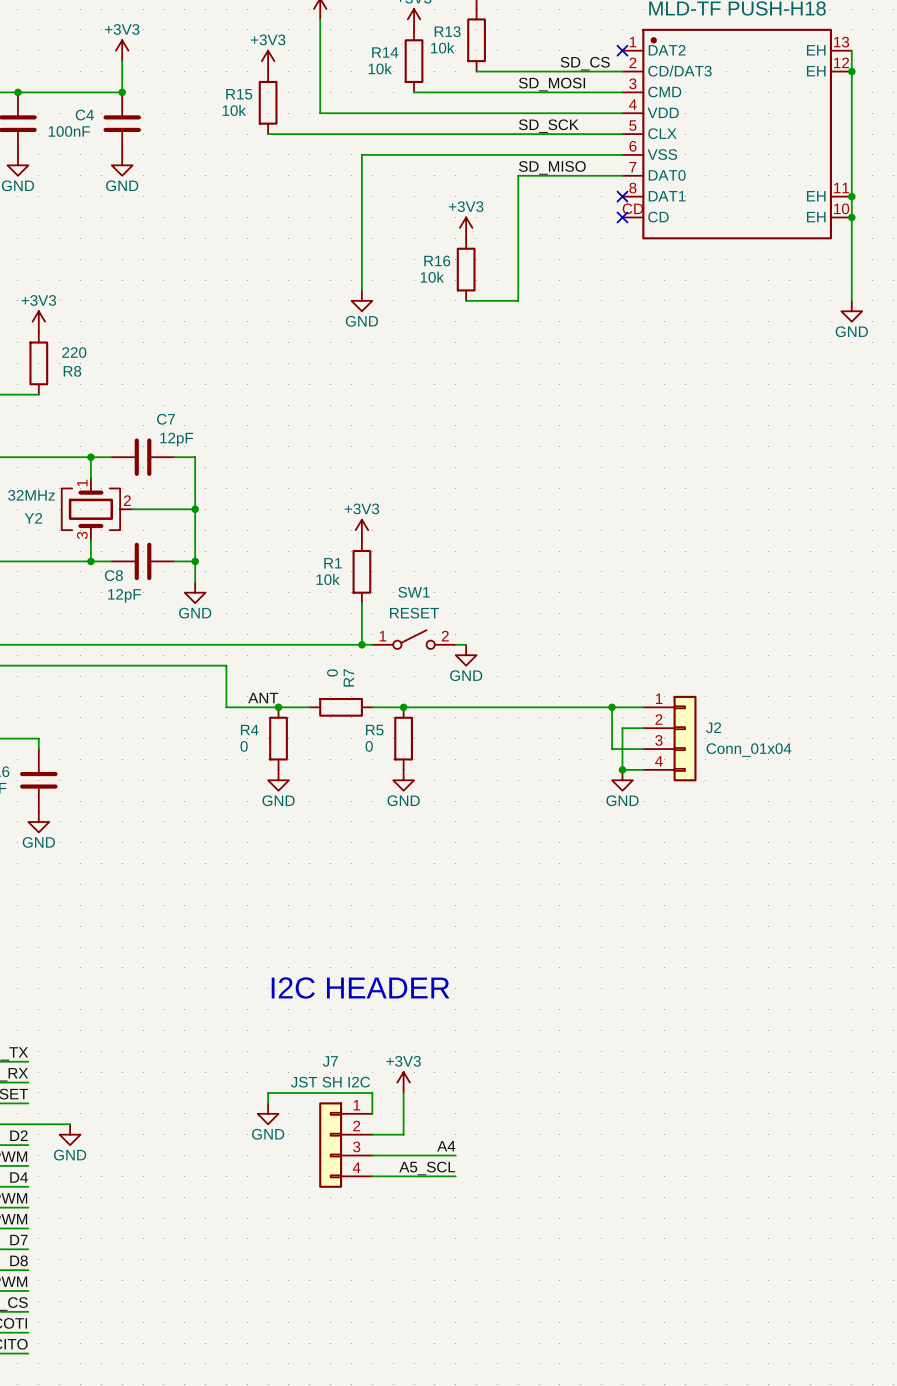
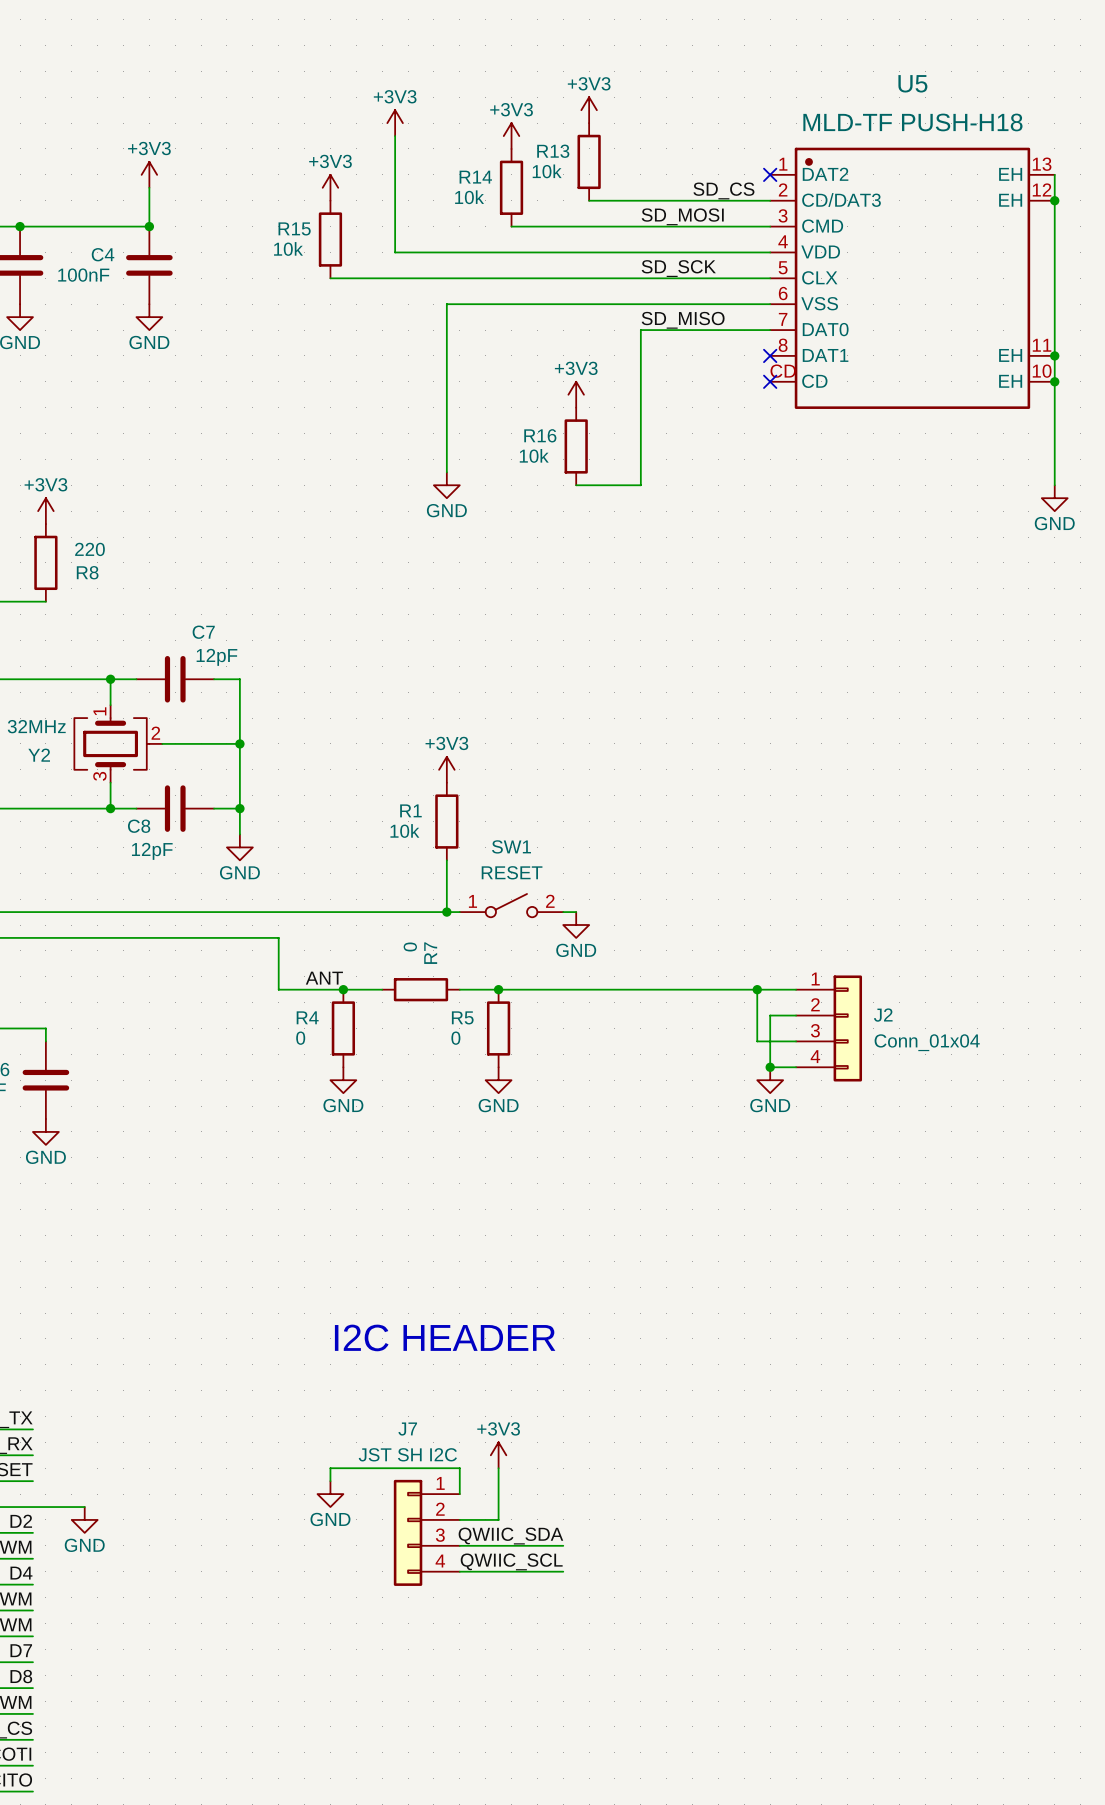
label: A4 (446, 1146) -> QWIIC_SDA (510, 1536)
label: A5_SCL (427, 1168) -> QWIIC_SCL (511, 1561)

